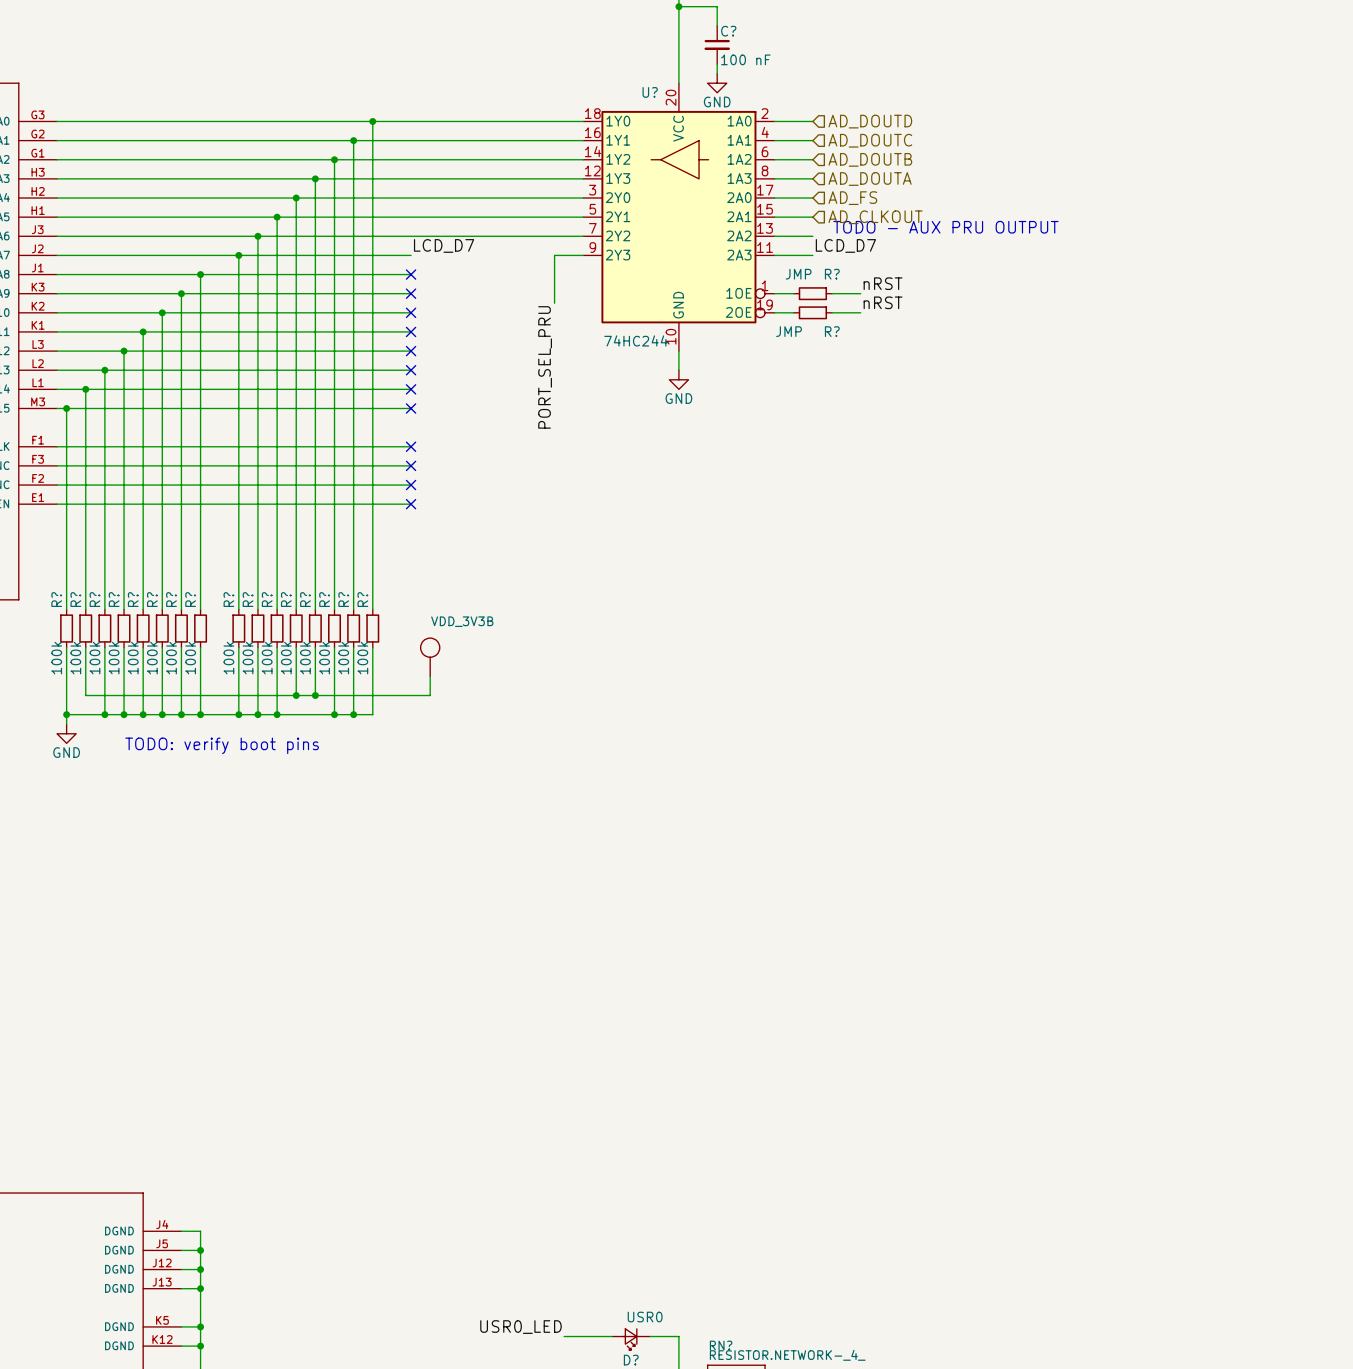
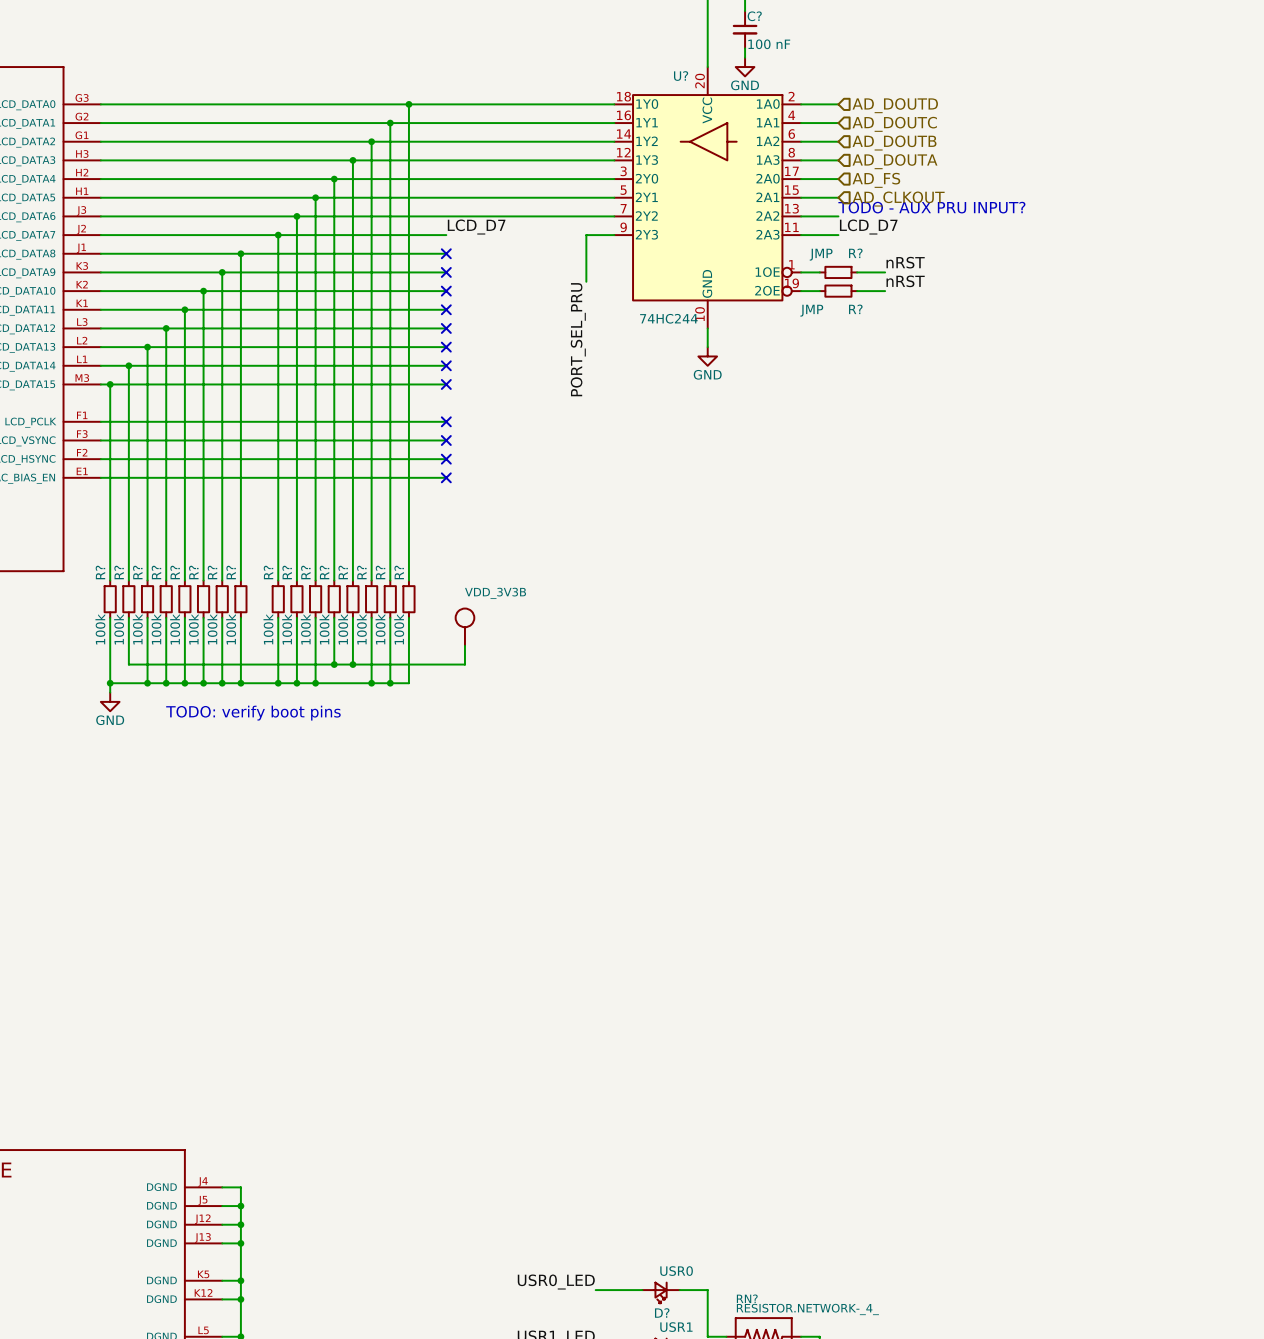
text: TODO - AUX PRU OUTPUT (945, 227) -> TODO - AUX PRU INPUT? (931, 207)

